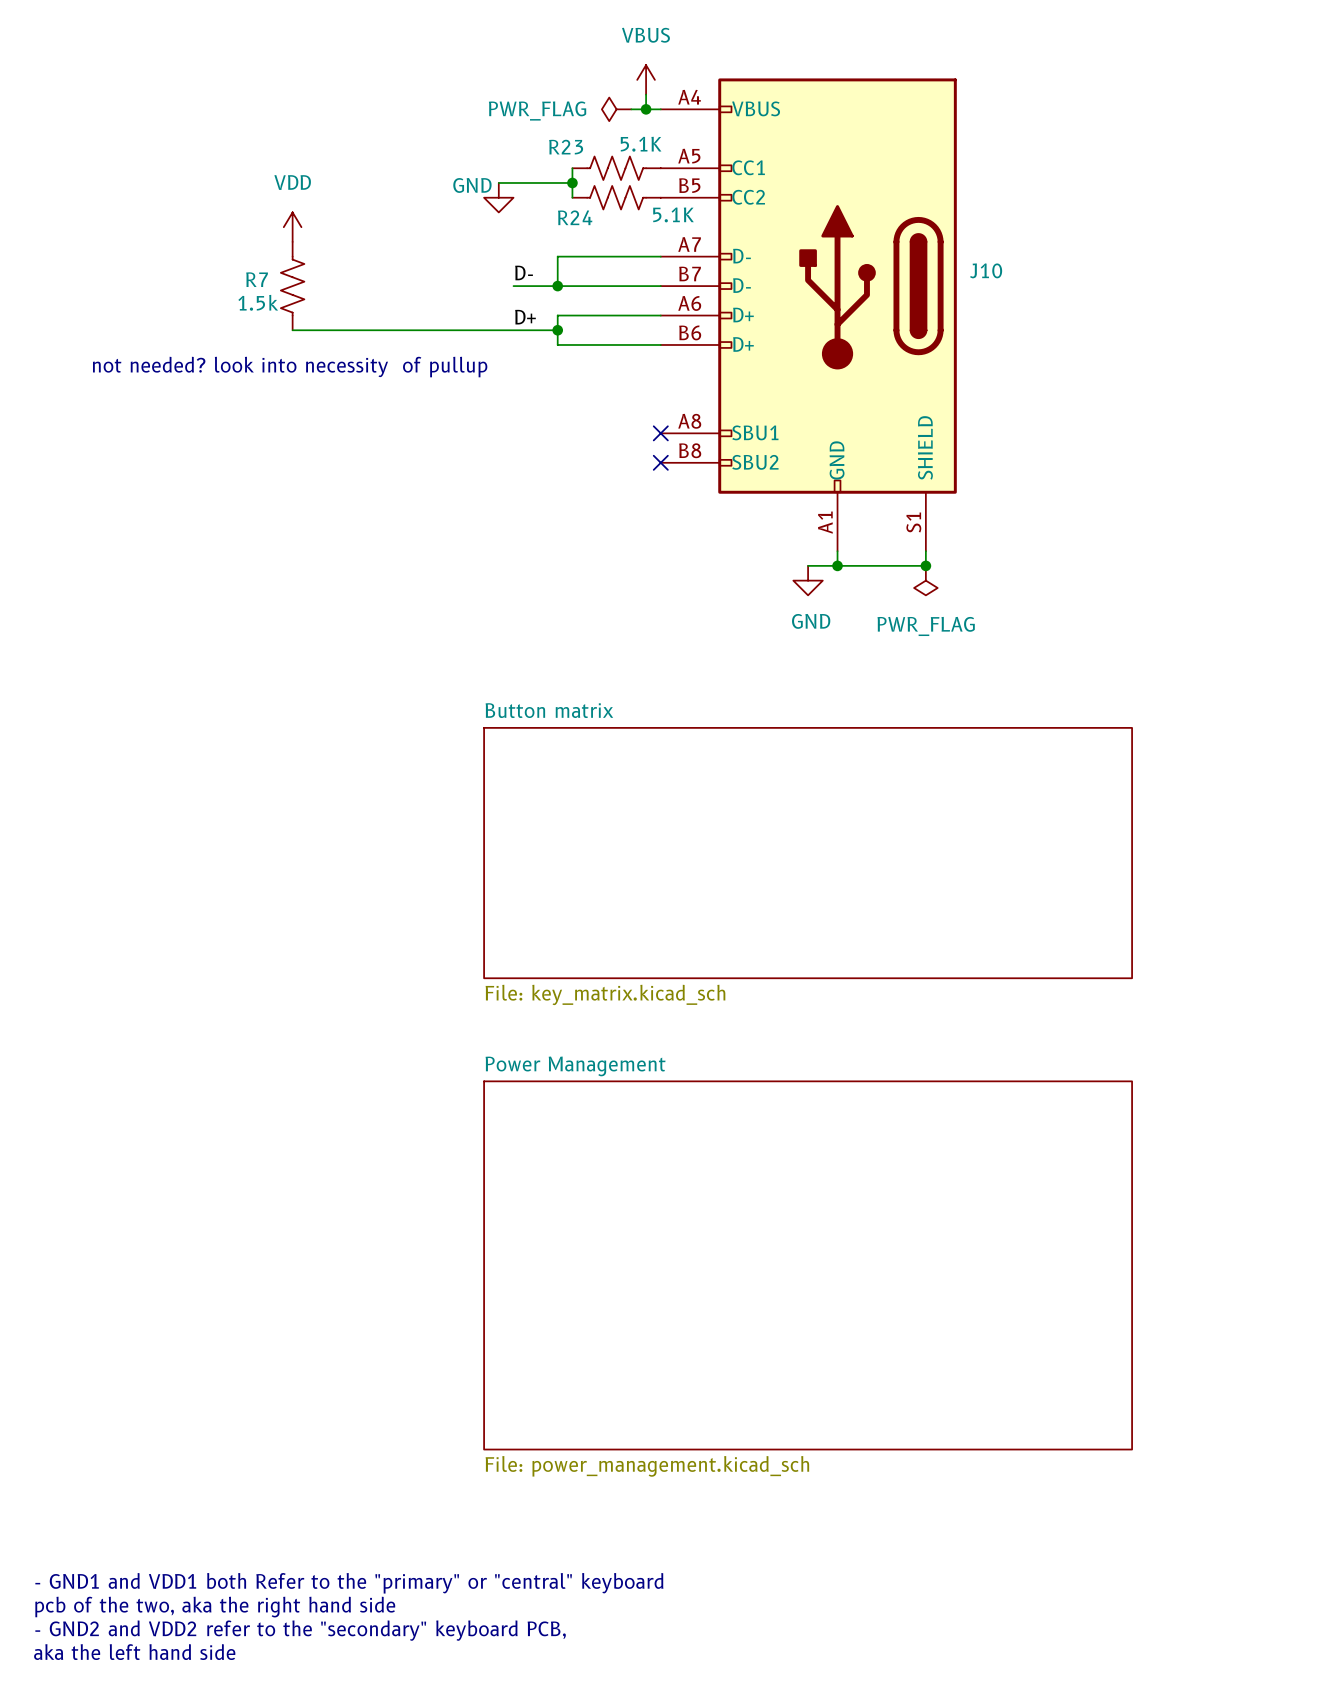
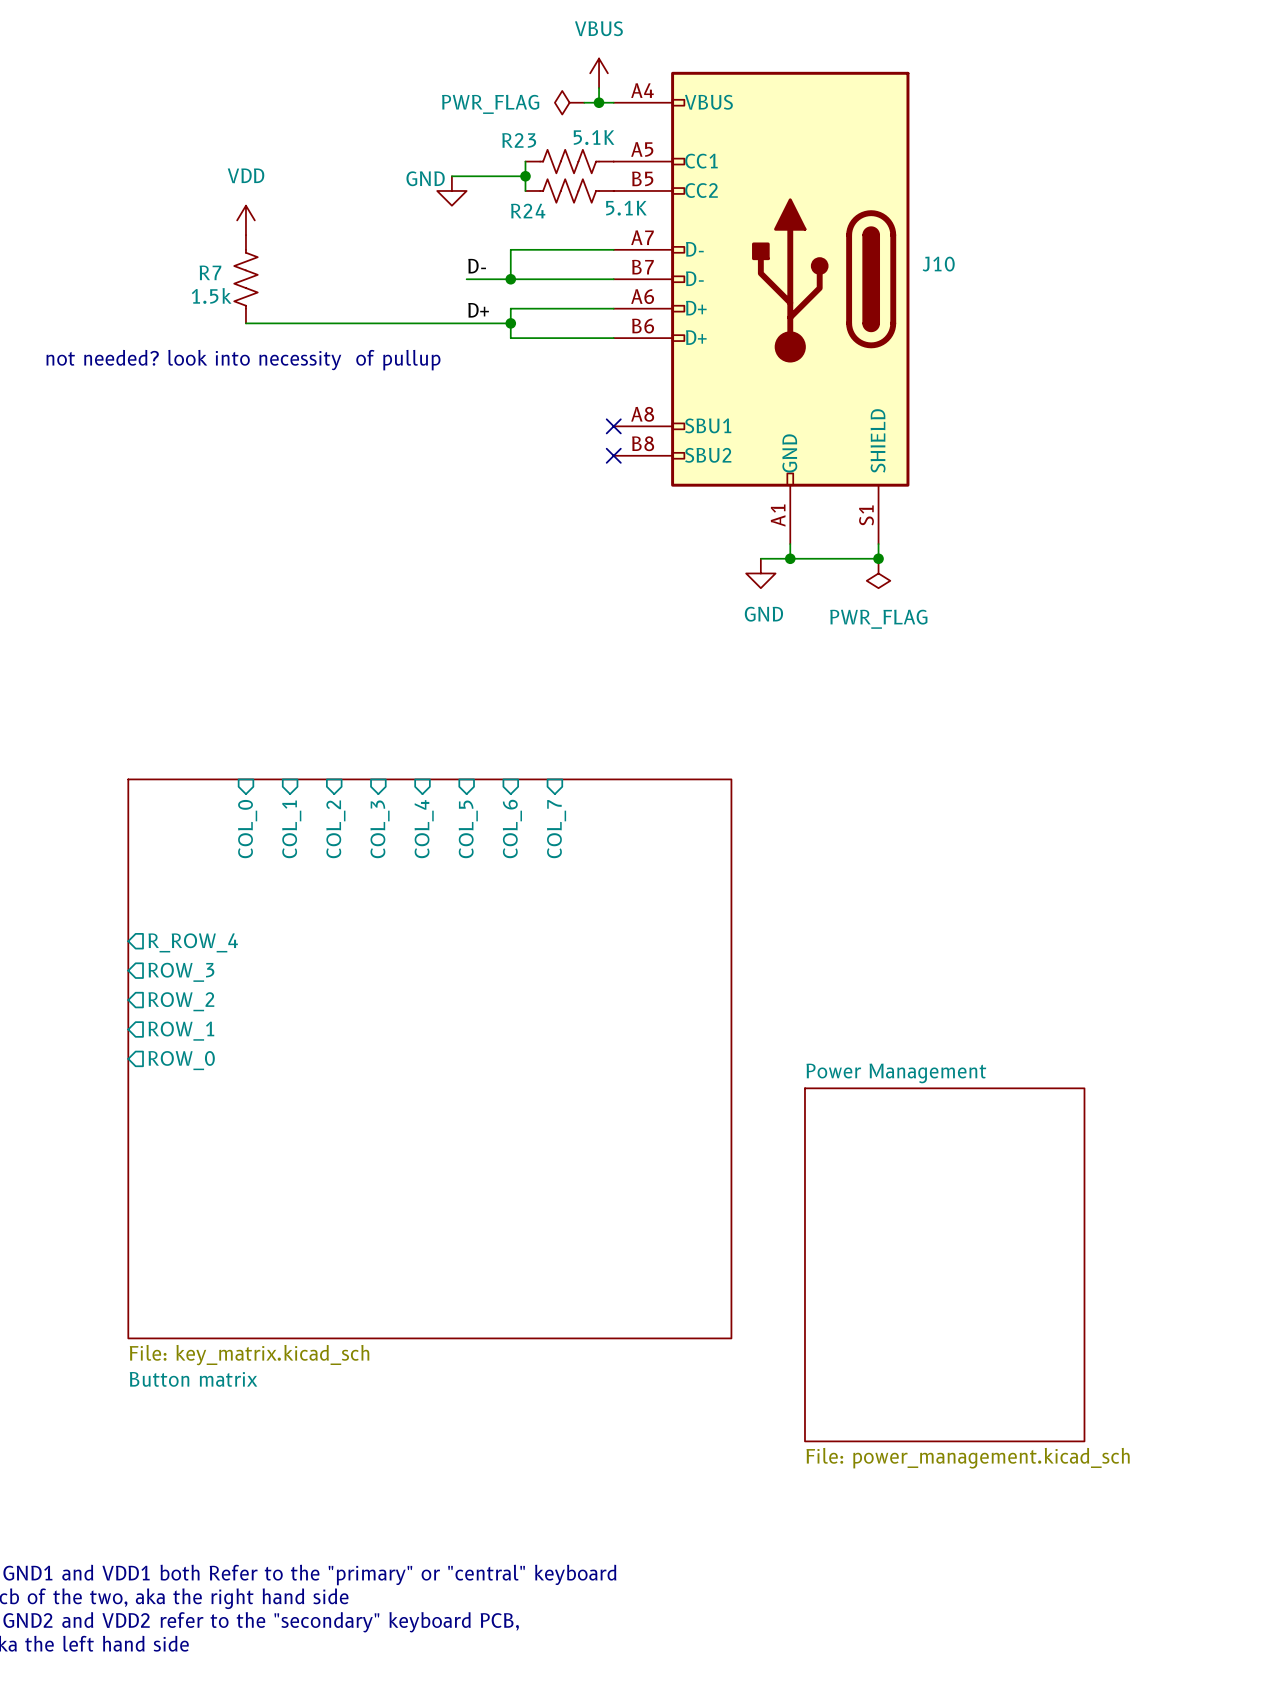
sheet pin: none -> COL_0 (247, 829)
sheet pin: none -> COL_1 (291, 829)
sheet pin: none -> COL_2 (335, 829)
sheet pin: none -> COL_3 (380, 829)
sheet pin: none -> COL_4 (424, 829)
sheet pin: none -> COL_5 (468, 829)
sheet pin: none -> COL_6 (512, 828)
sheet pin: none -> COL_7 (556, 829)
sheet Button matrix: File: key_matrix.kicad_sch (808, 853) -> none
sheet pin: none -> R_ROW_4 (193, 942)
sheet pin: none -> ROW_3 (181, 972)
sheet pin: none -> ROW_2 (181, 1001)
sheet pin: none -> ROW_1 (181, 1031)
sheet Button matrix: none -> File: key_matrix.kicad_sch (429, 1058)
sheet pin: none -> ROW_0 (181, 1060)
sheet Power Management: File: power_management.kicad_sch (808, 1265) -> none
sheet Power Management: none -> File: power_management.kicad_sch (944, 1264)

